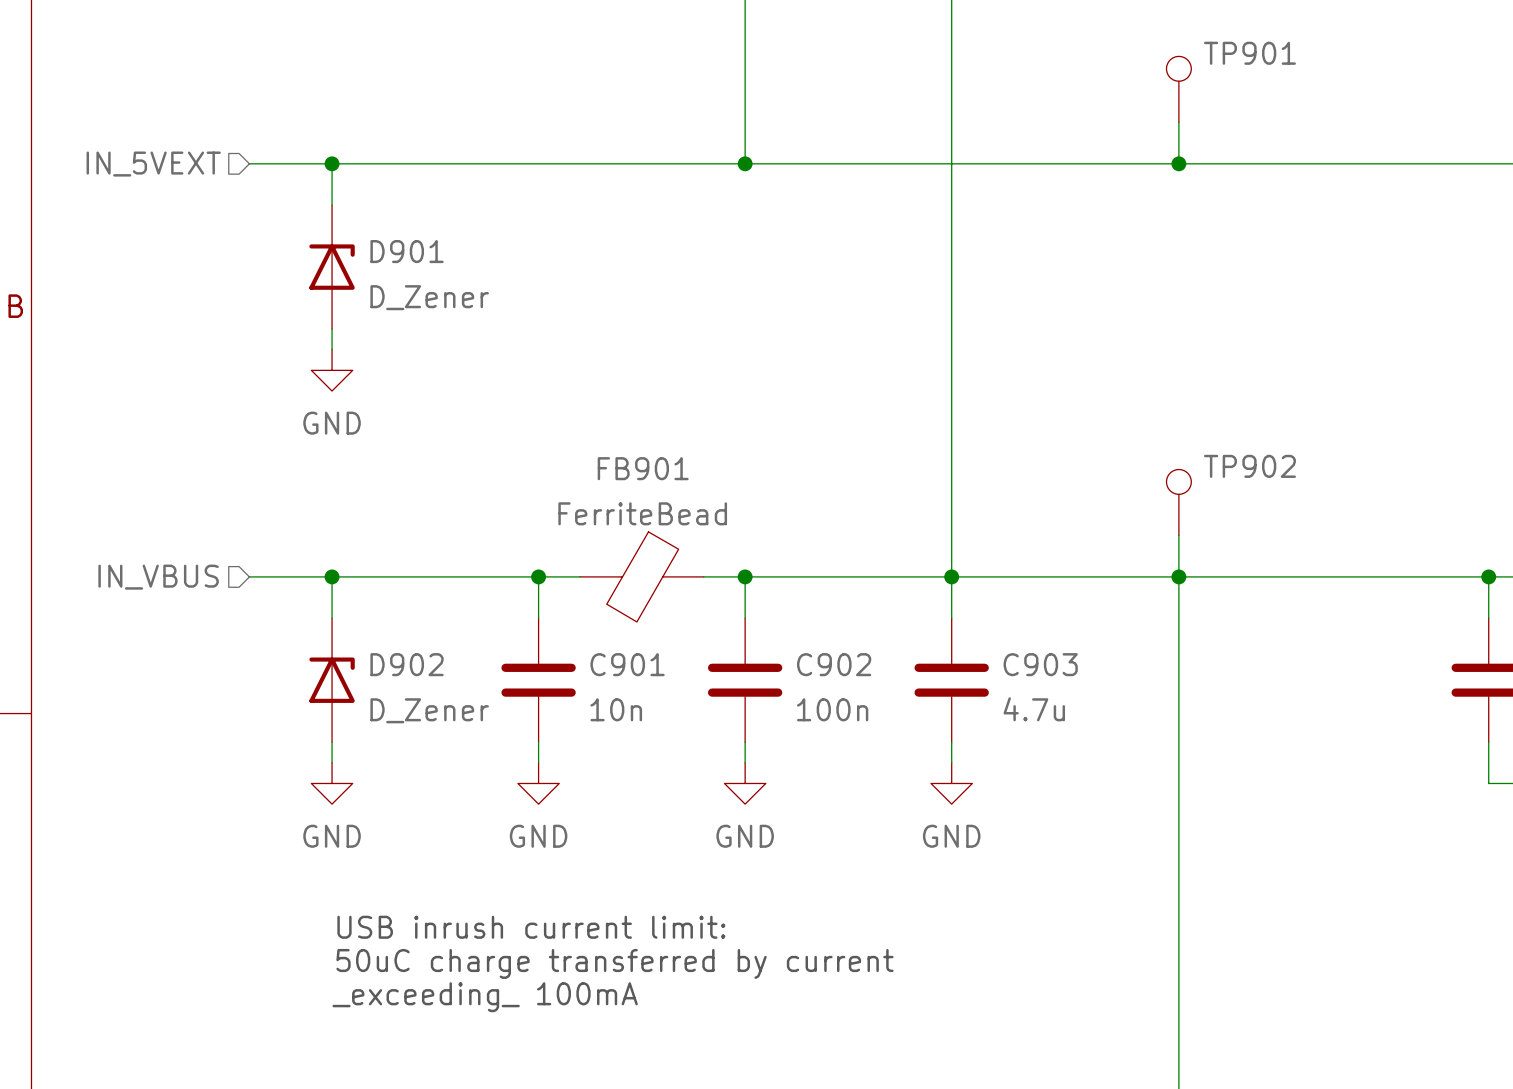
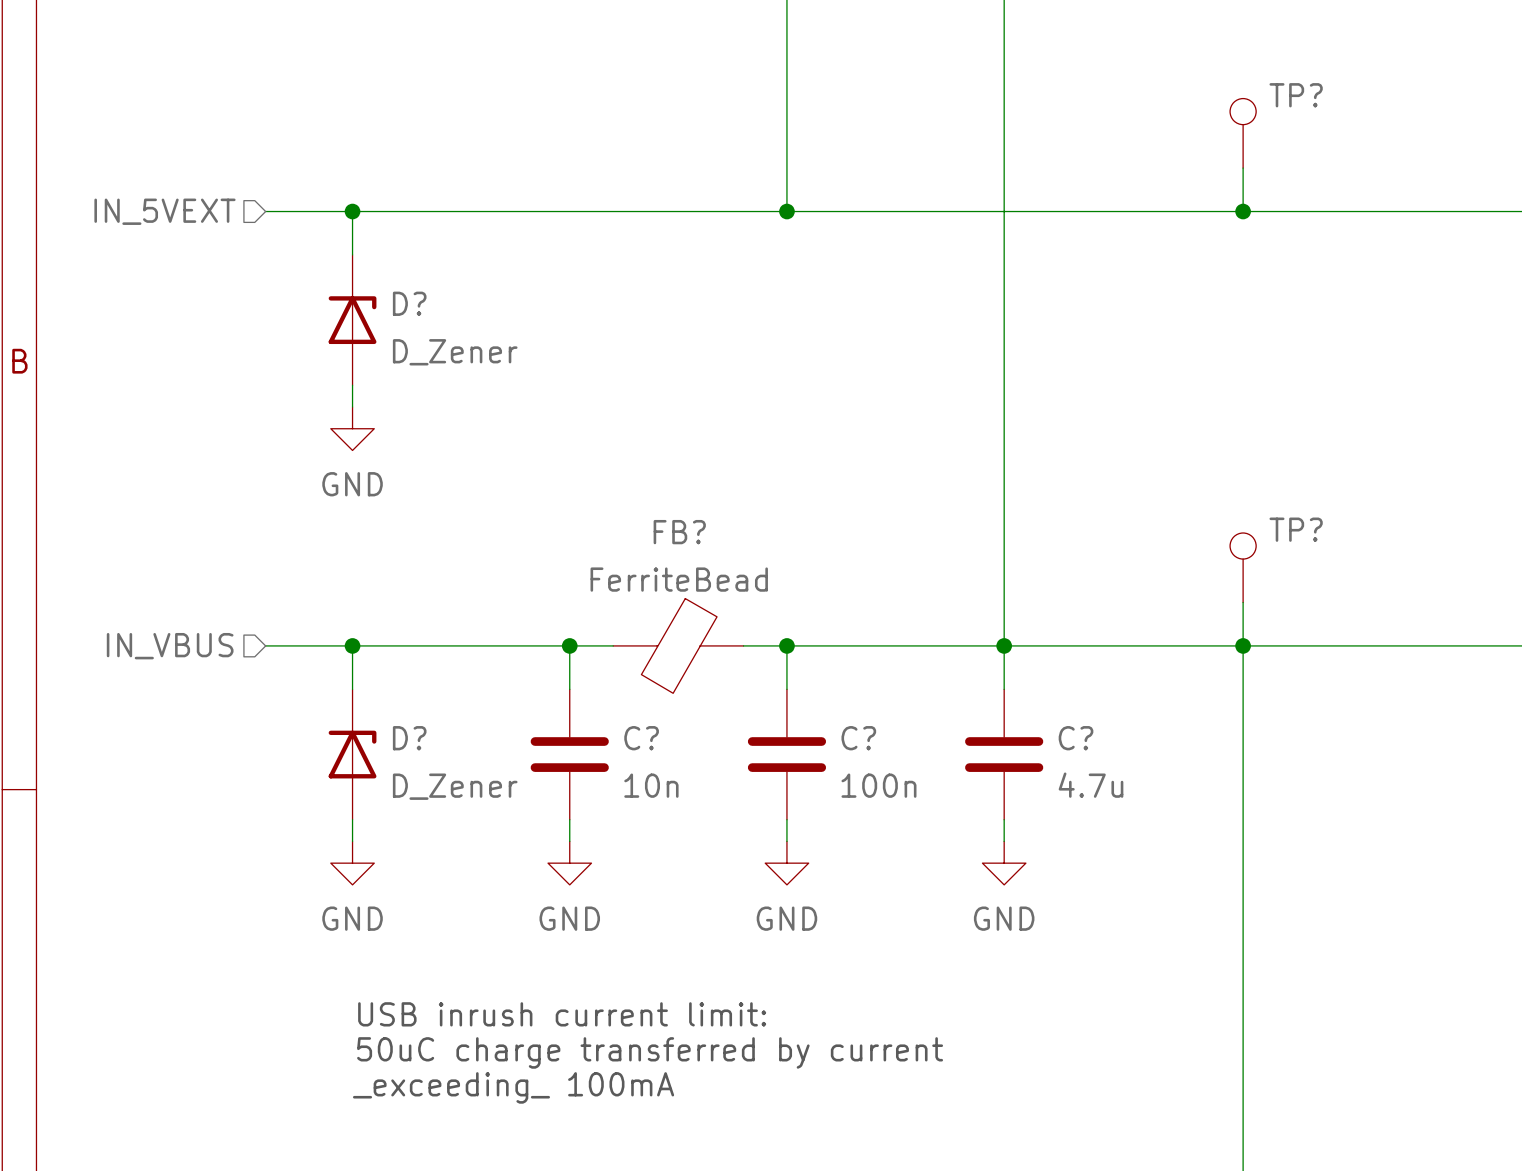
TP901 name: TP901 (1249, 53) -> TP? (1296, 95)
D901 name: D901 (407, 251) -> D? (409, 303)
TP902 name: TP902 (1249, 466) -> TP? (1296, 529)
FB901 name: FB901 (643, 468) -> FB? (679, 532)
D902 name: D902 (407, 664) -> D? (409, 738)
C901 name: C901 (627, 664) -> C? (641, 738)
C902 name: C902 (834, 664) -> C? (858, 738)
C903 name: C903 (1040, 664) -> C? (1076, 738)

